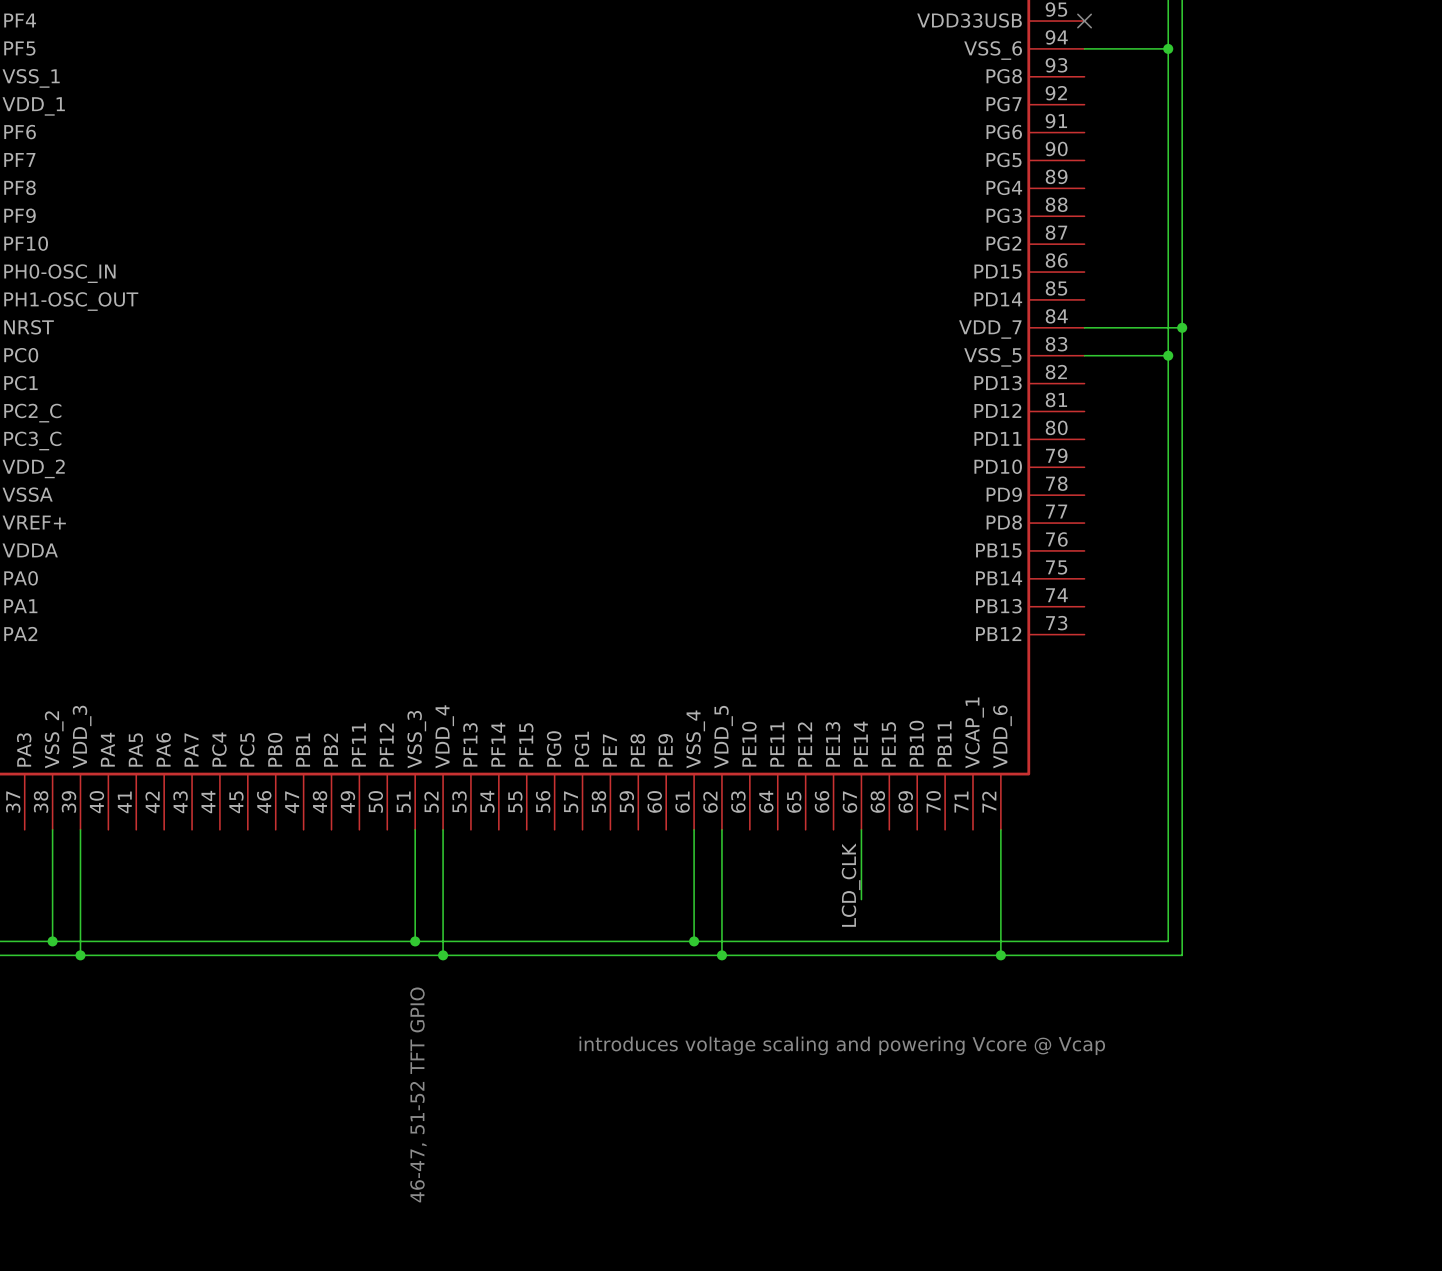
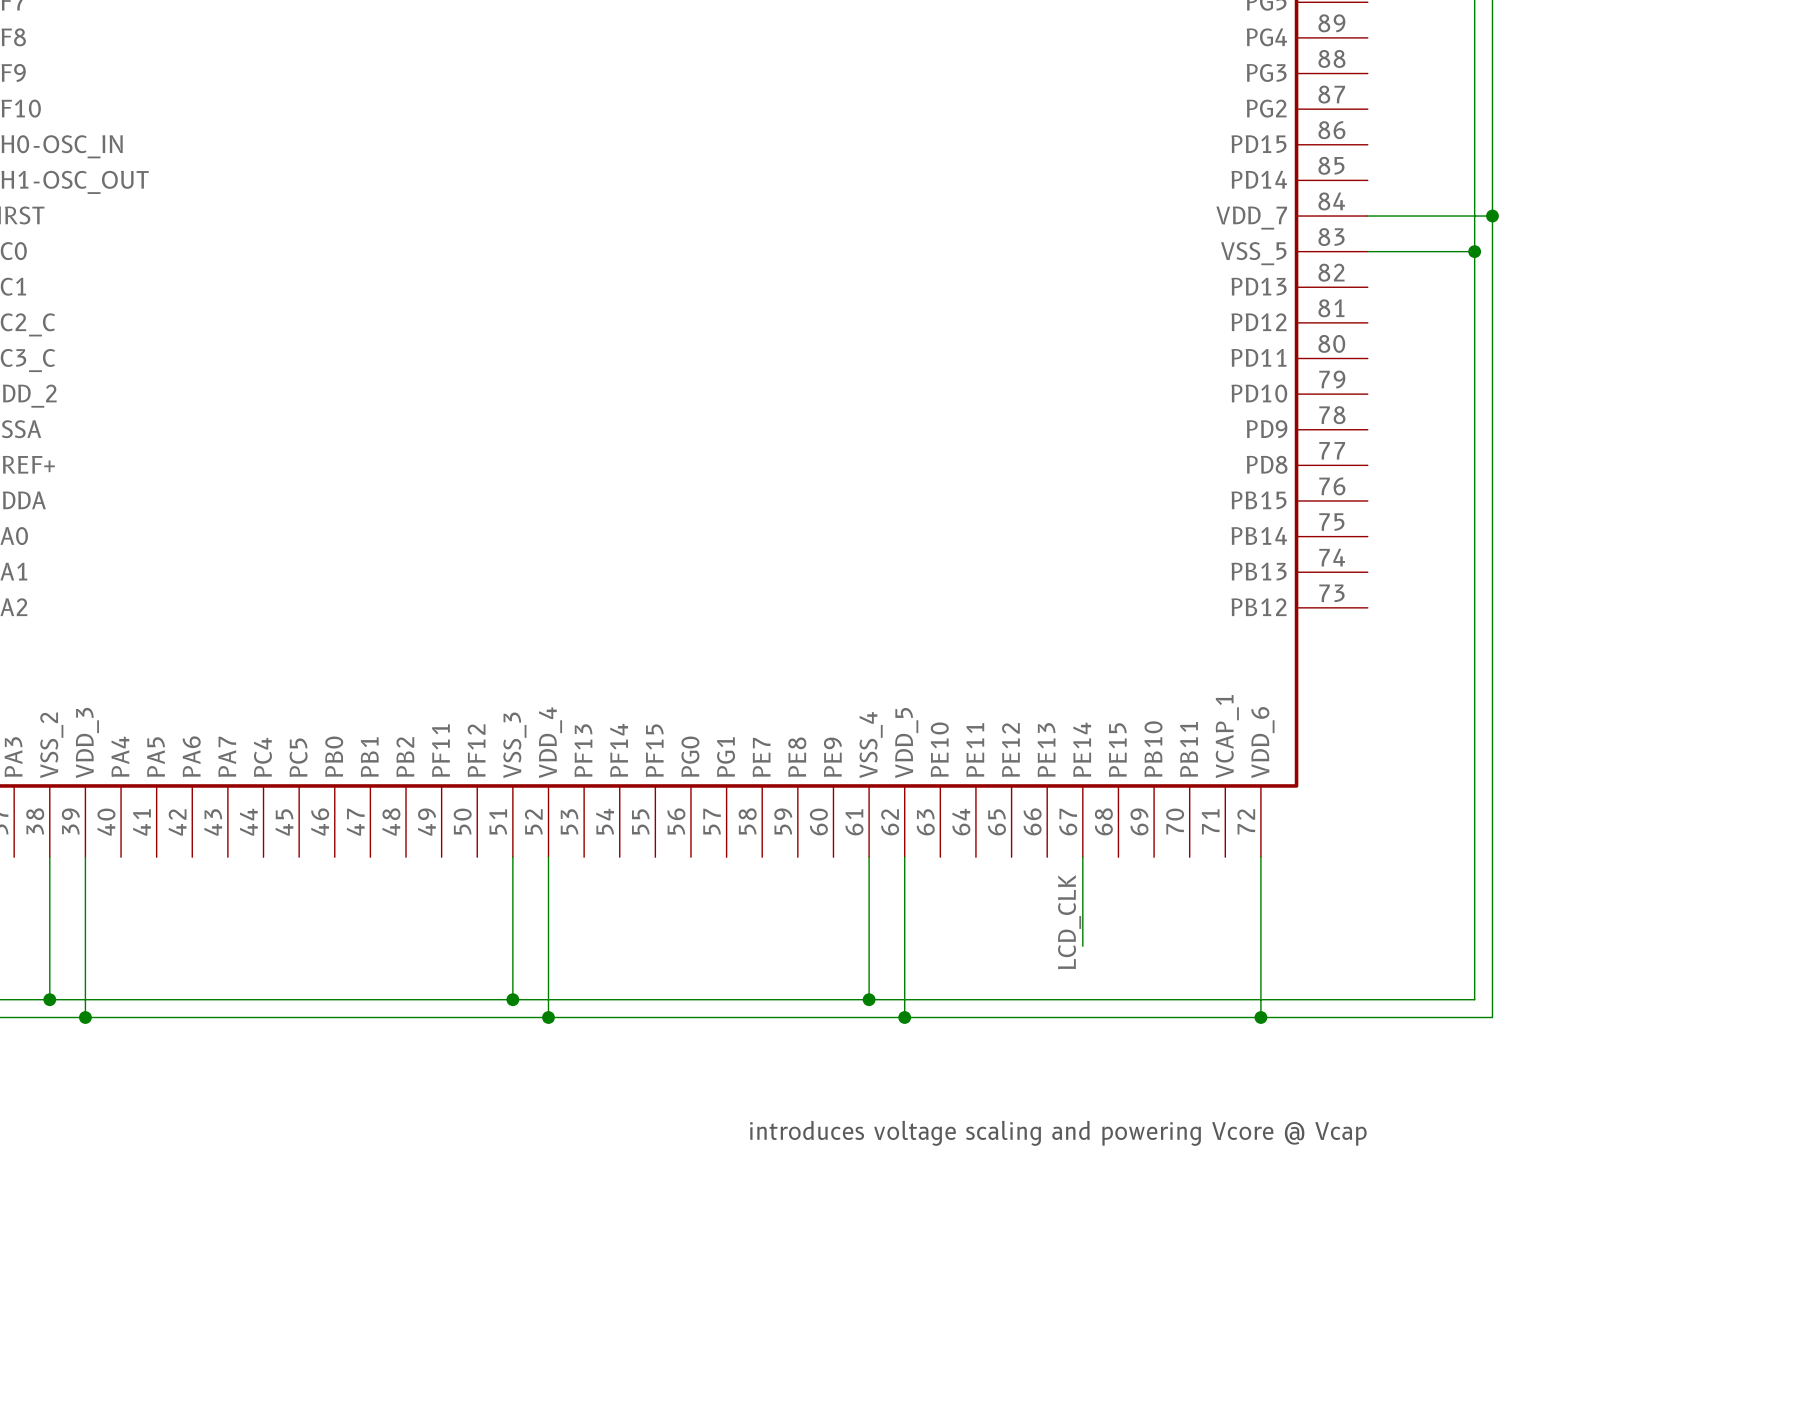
text: 46-47, 51-52 TFT GPIO (418, 1094) -> none

